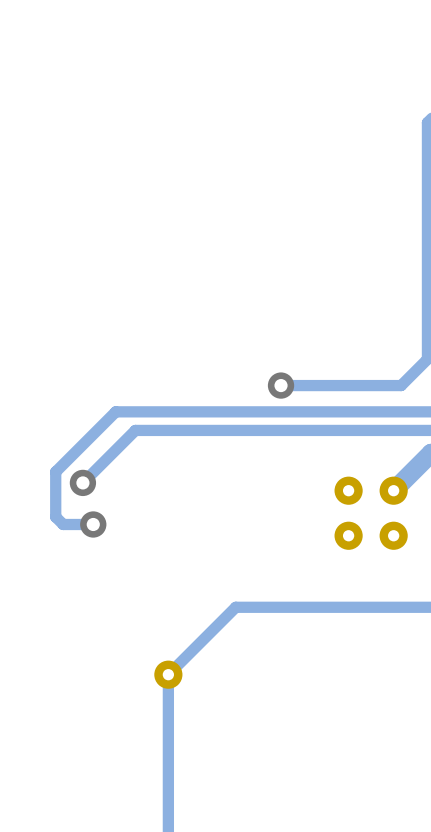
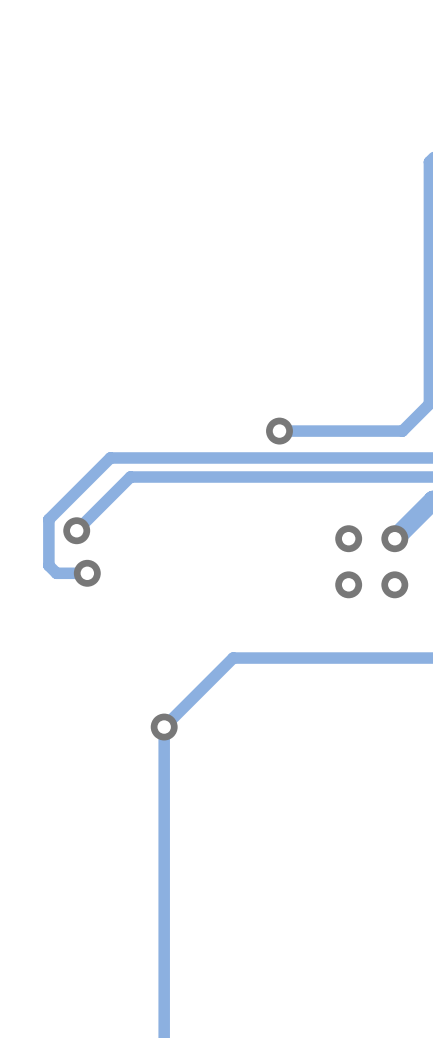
part: (348, 490) -> none
via: none -> (348, 538)
part: (393, 490) -> none
via: none -> (394, 538)
part: (348, 535) -> none
via: none -> (348, 584)
part: (393, 535) -> none
via: none -> (394, 584)
part: (168, 674) -> none
via: none -> (164, 727)

